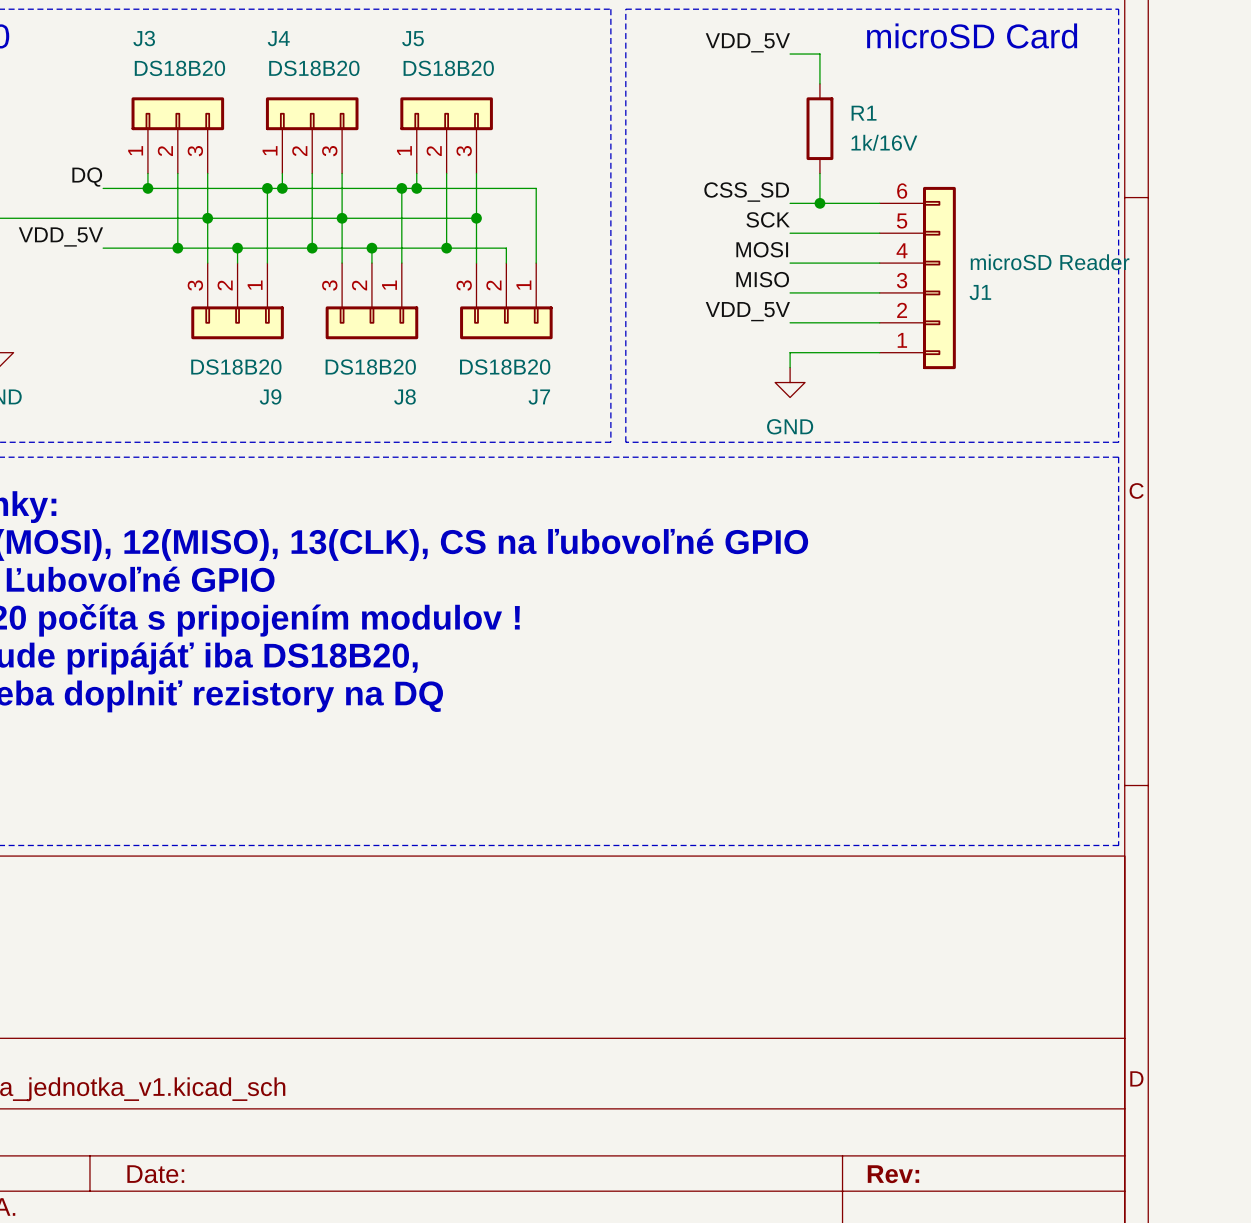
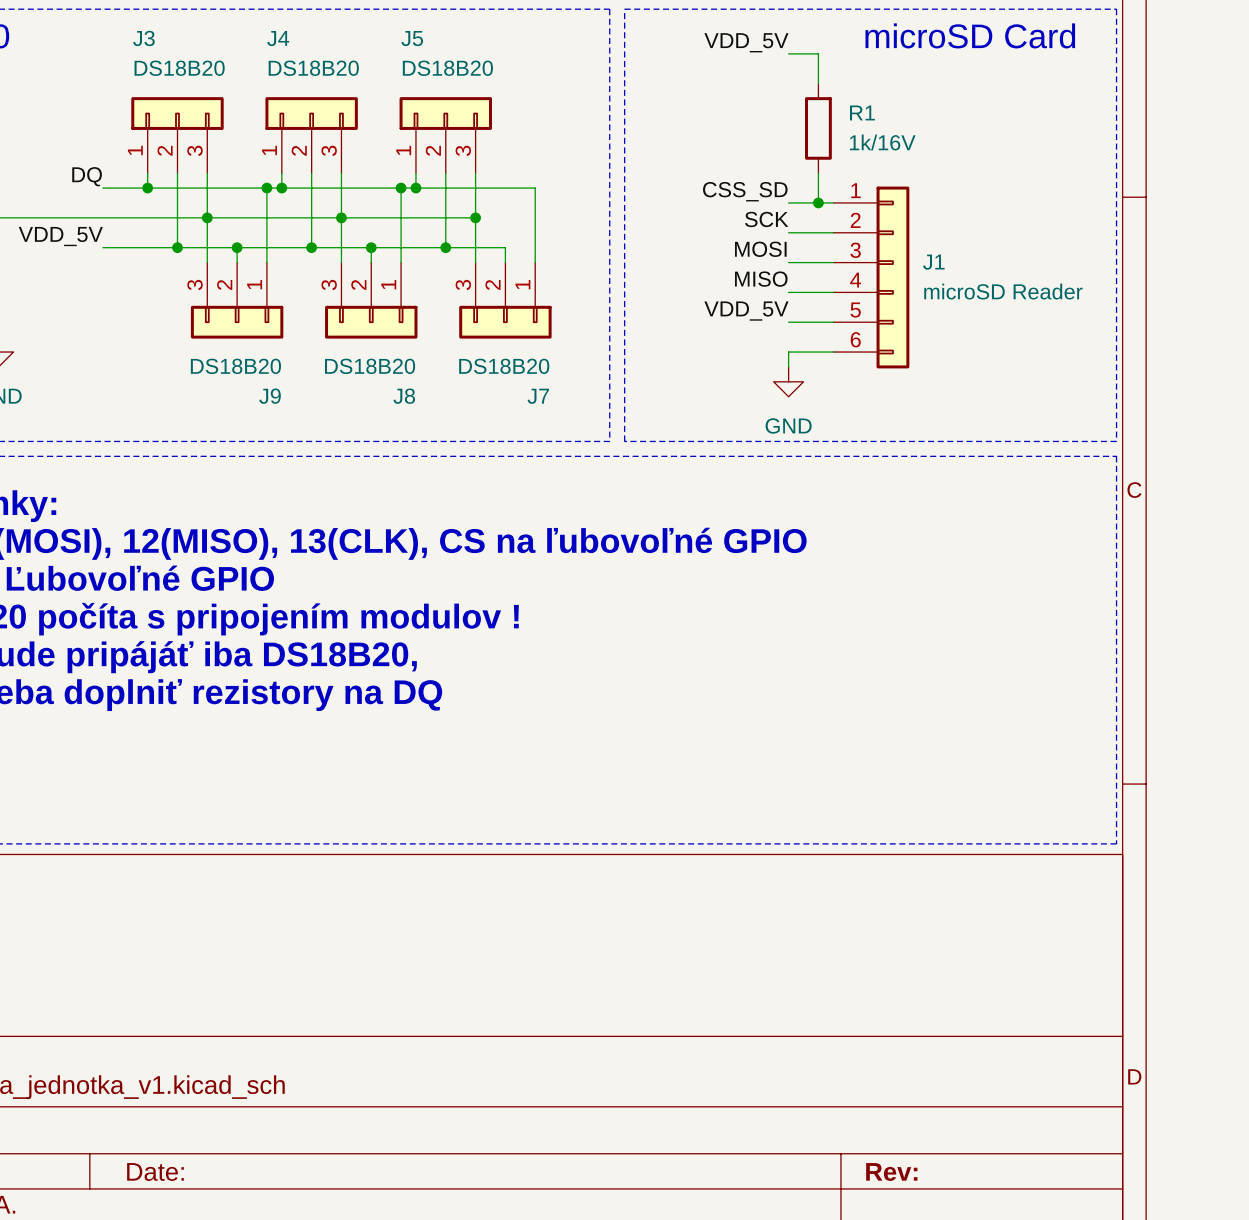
J1 flip: as is (939, 278) -> up-down (892, 277)

